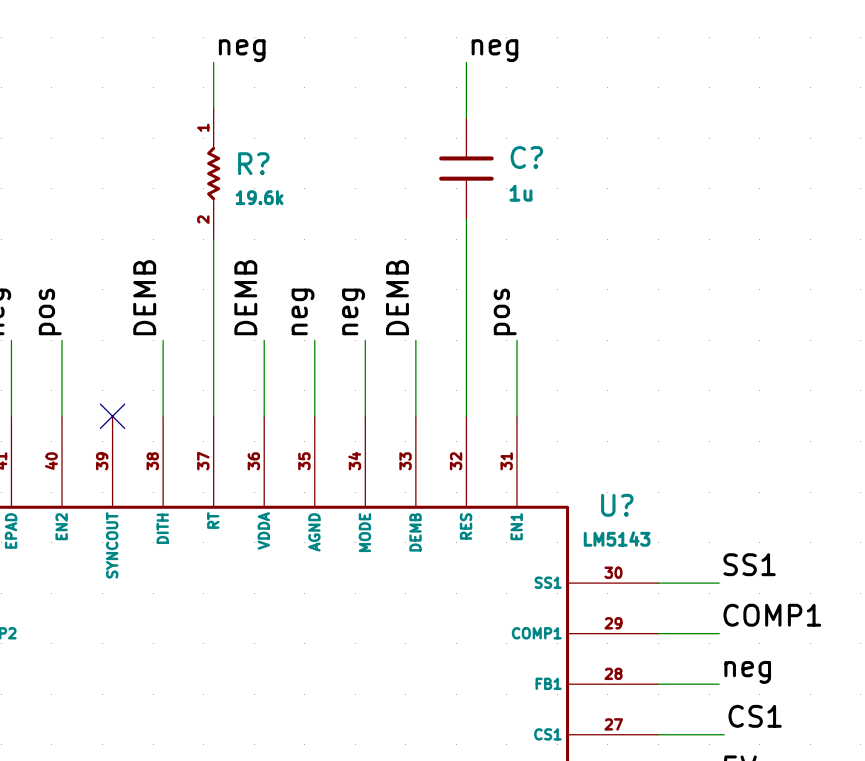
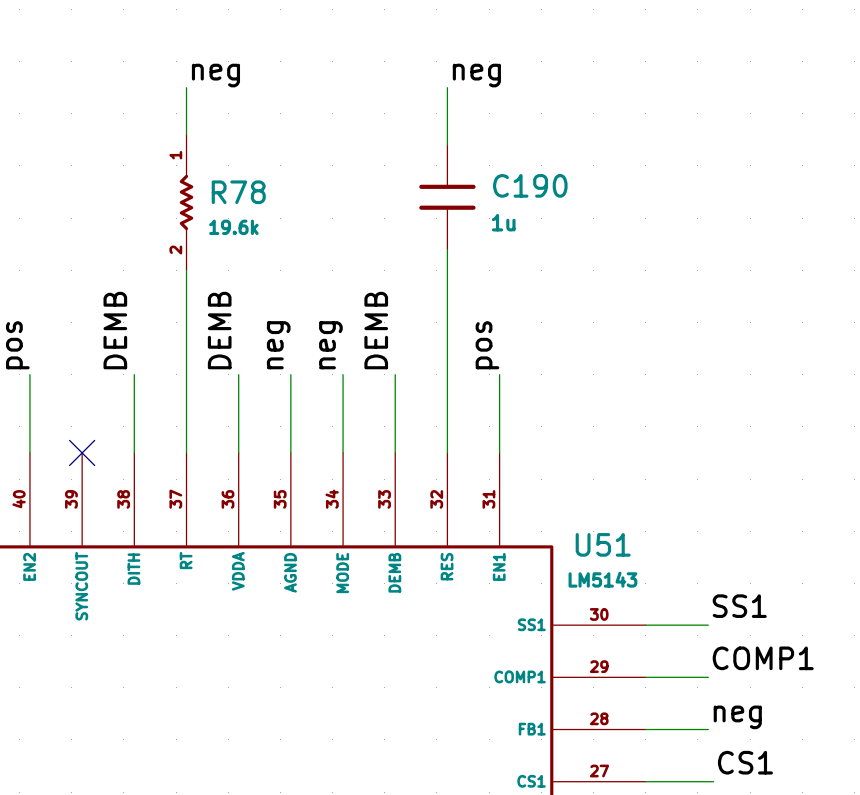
C? name: C? (526, 157) -> C190 (530, 185)
R? name: R? (253, 163) -> R78 (238, 192)
U? name: U? (617, 505) -> U51 (603, 544)

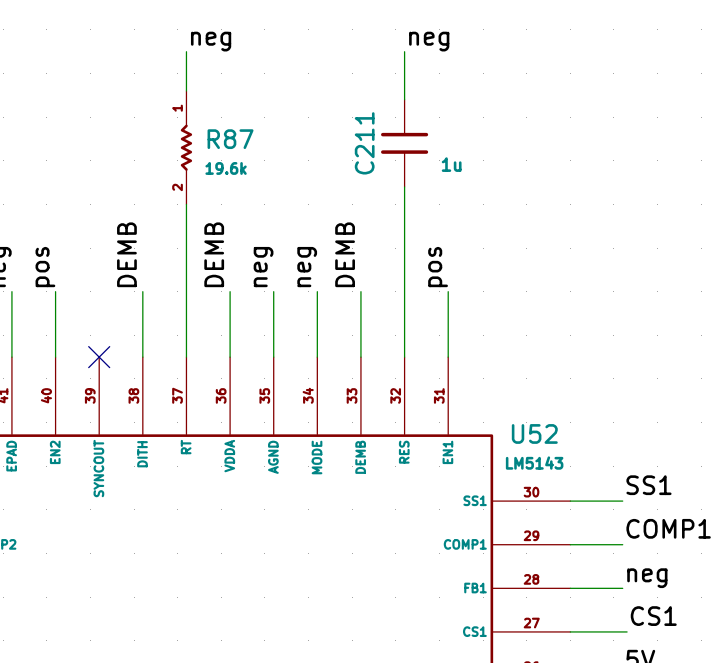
C190 name: C190 (530, 185) -> C211 (364, 143)
R78 name: R78 (238, 192) -> R87 (230, 139)
U51 name: U51 (603, 544) -> U52 (534, 433)

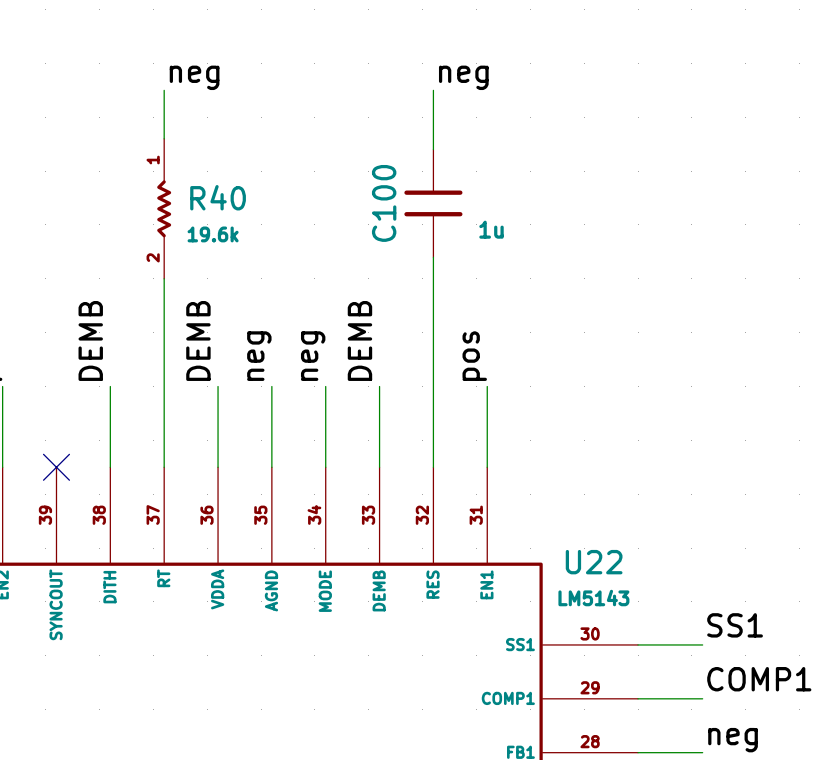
R87 name: R87 (230, 139) -> R40 (218, 197)
C211 name: C211 (364, 143) -> C100 (384, 203)
U52 name: U52 (534, 433) -> U22 (594, 562)

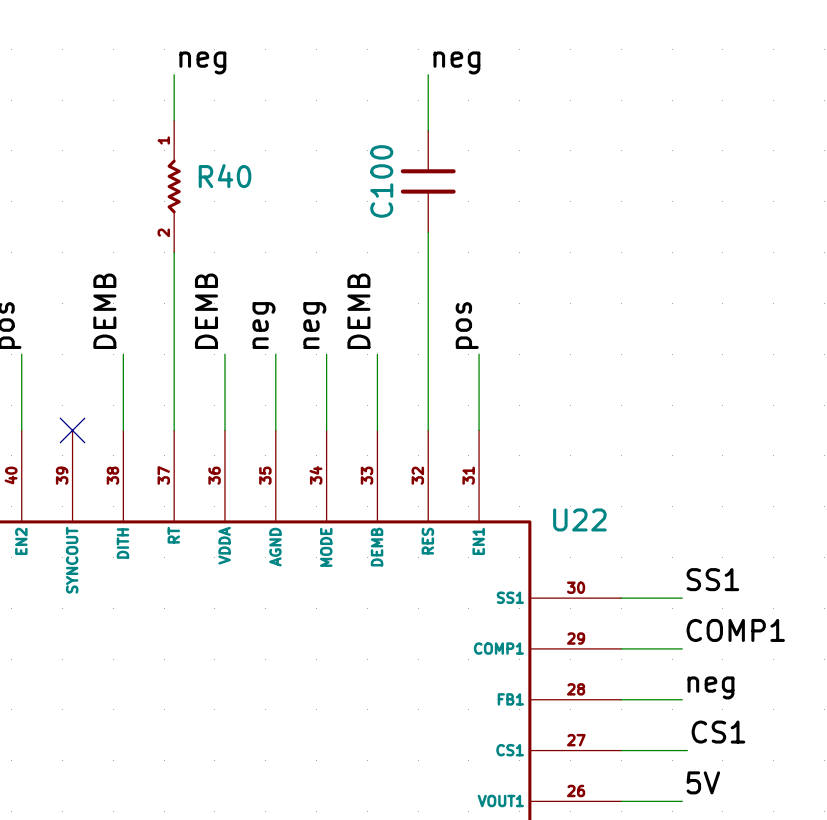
C100 value: 1u (491, 229) -> none
R40 value: 19.6k (213, 234) -> none
U22 value: LM5143 (593, 598) -> none

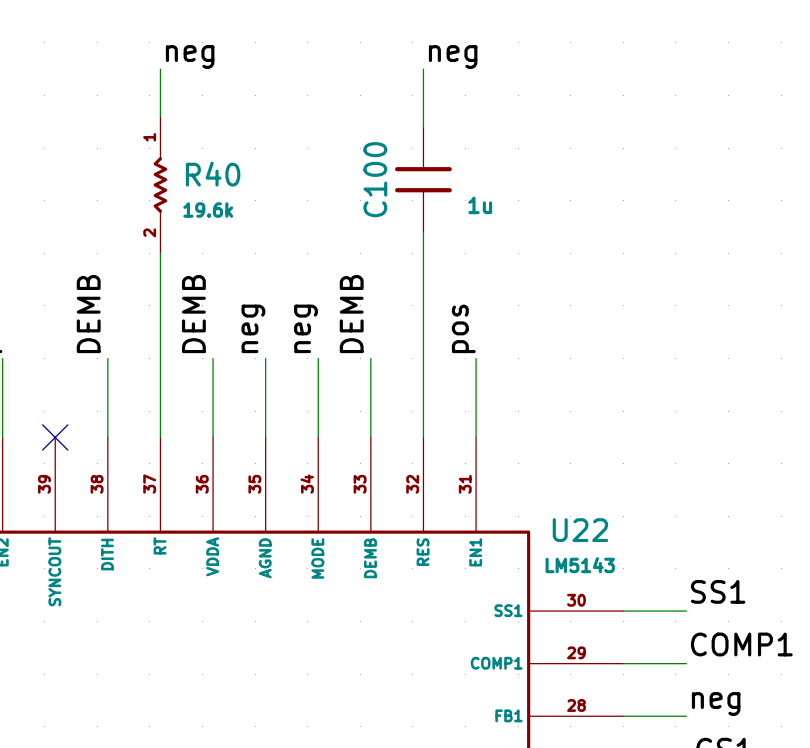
C100 value: none -> 1u (480, 205)
R40 value: none -> 19.6k (208, 210)
U22 value: none -> LM5143 (580, 565)

